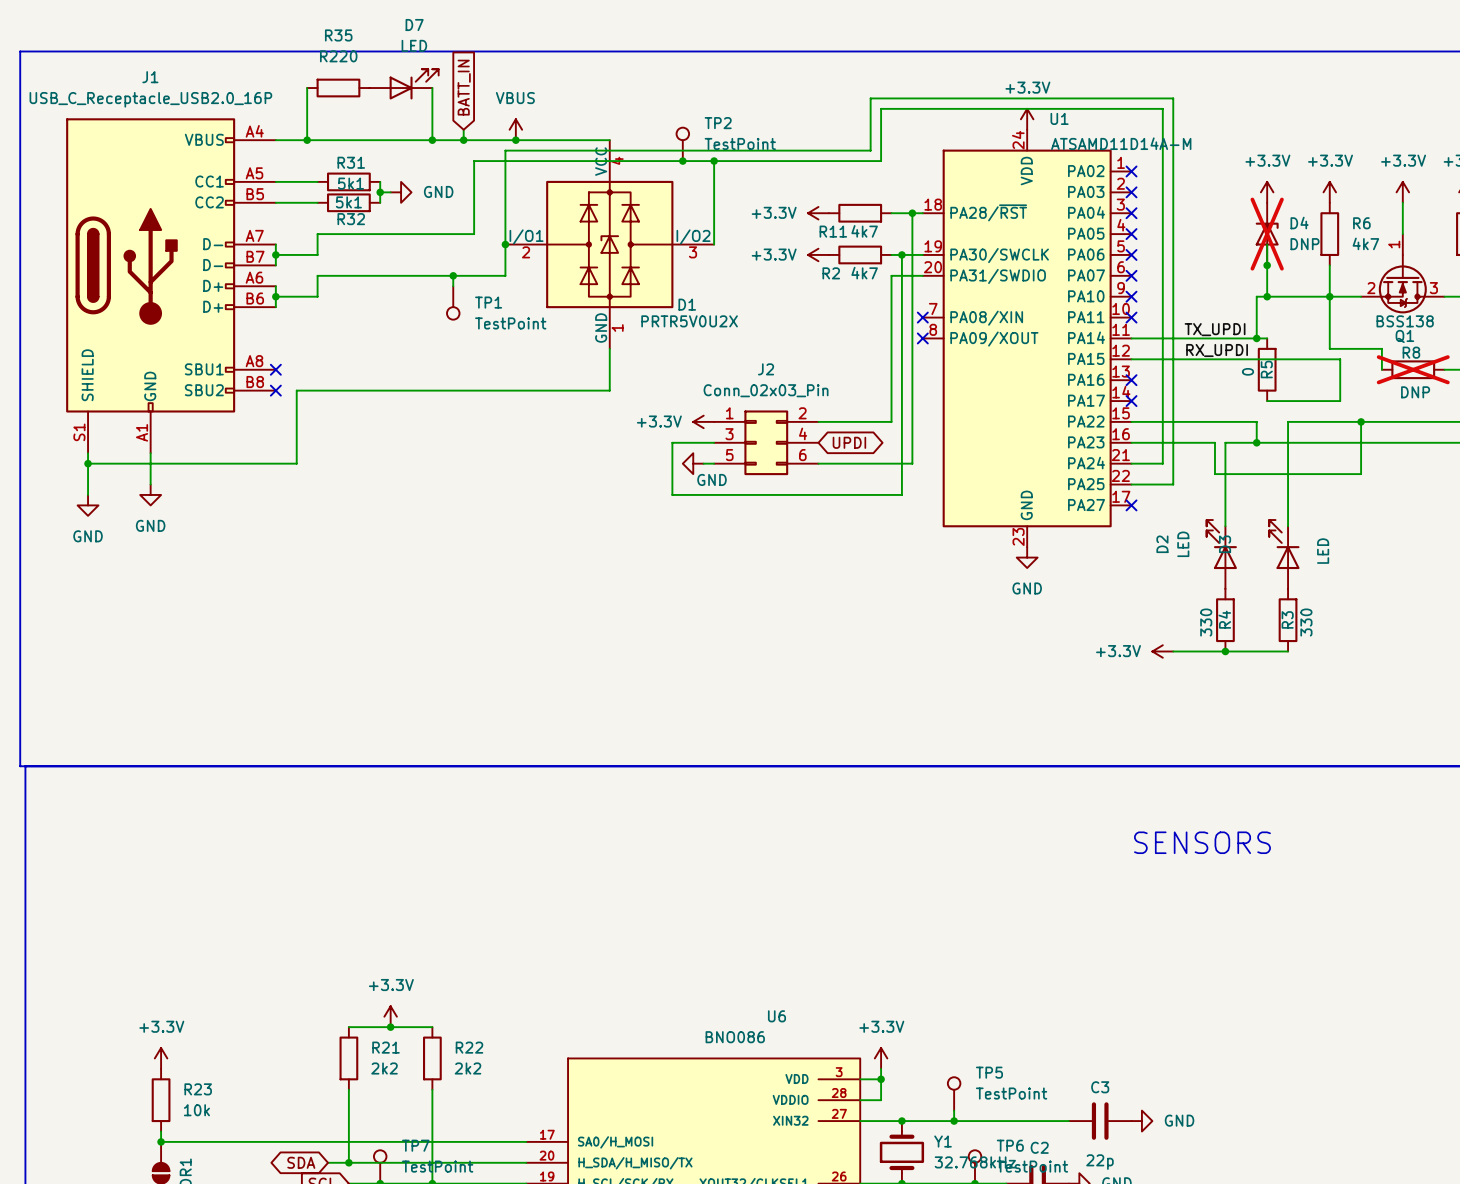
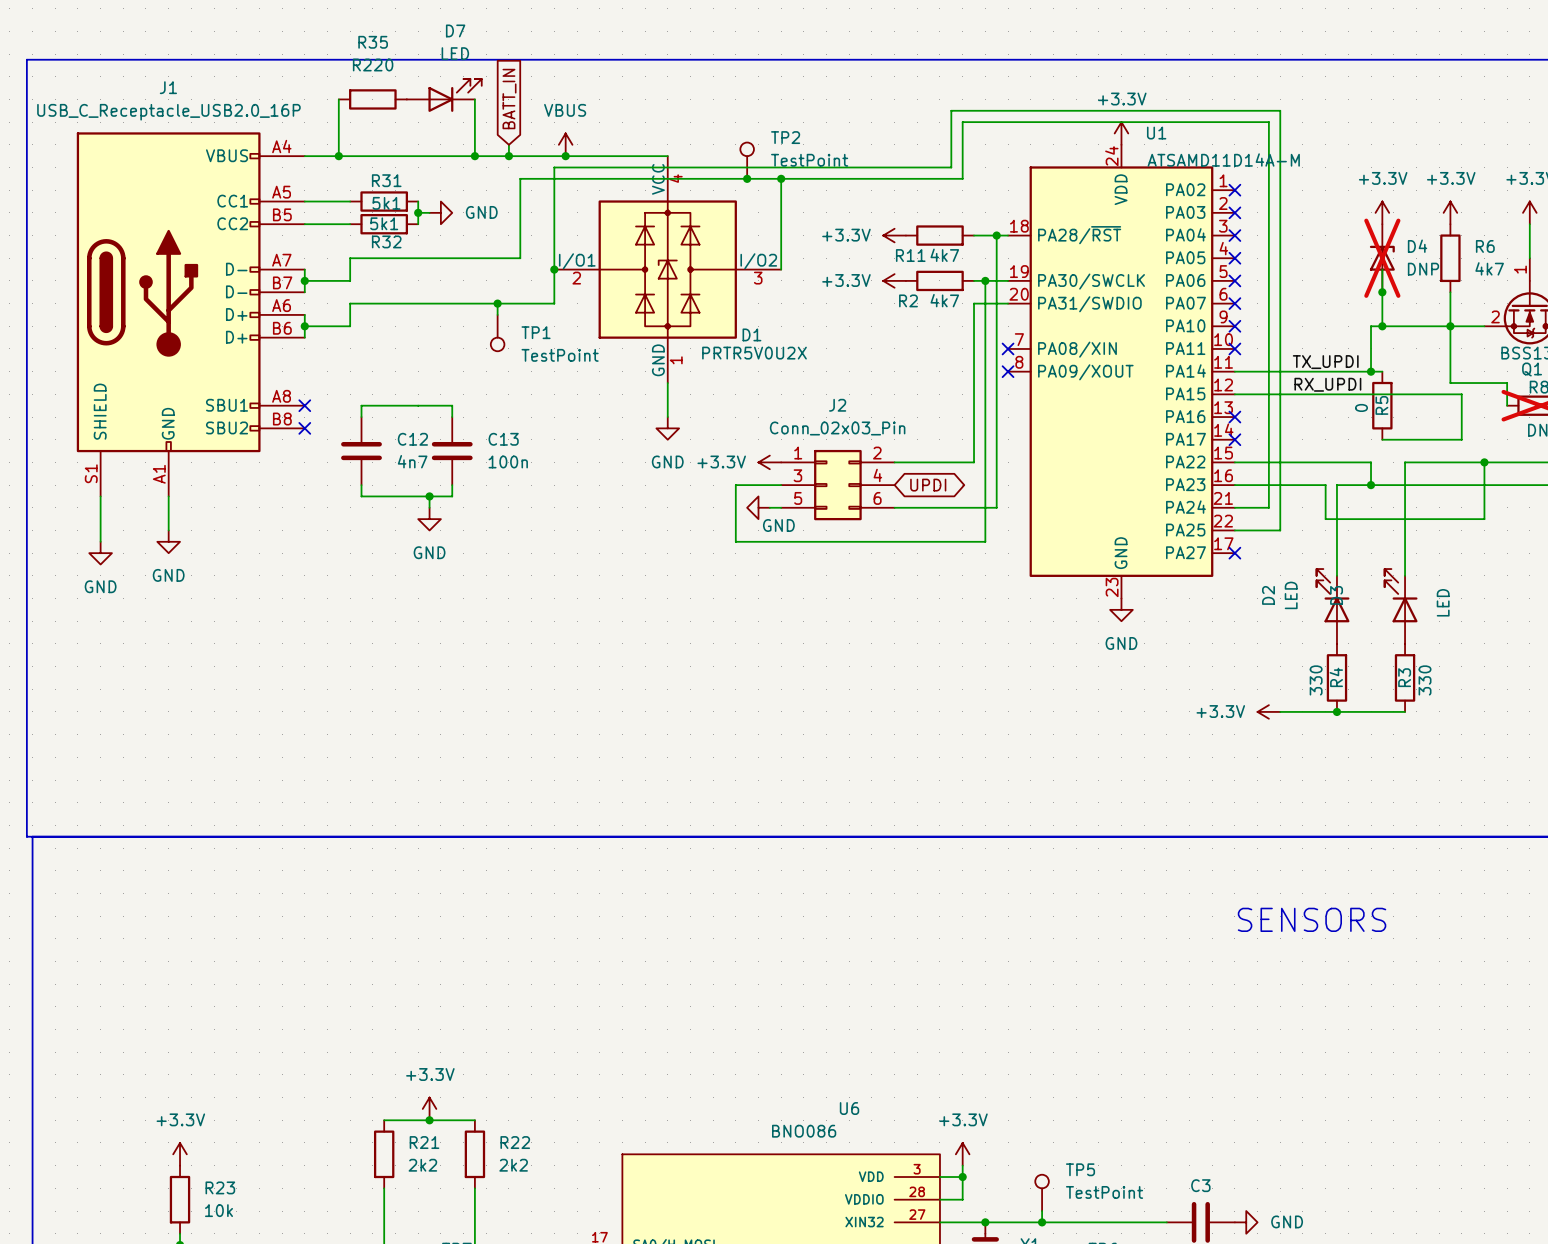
wire: none -> (361, 417) (361, 405) (452, 405) (452, 417)
wire: (609, 380) (609, 390) (296, 390) (296, 463) (88, 463) -> none
power symbol: none -> GND (667, 428)
C12: none -> 4n7 (361, 451)
C13: none -> 100n (452, 451)
wire: none -> (361, 485) (361, 496) (452, 496) (452, 485)
wire: none -> (429, 496) (429, 507)
junction: none -> (429, 496)
junction: (88, 463) -> none
power symbol: none -> GND (429, 519)

